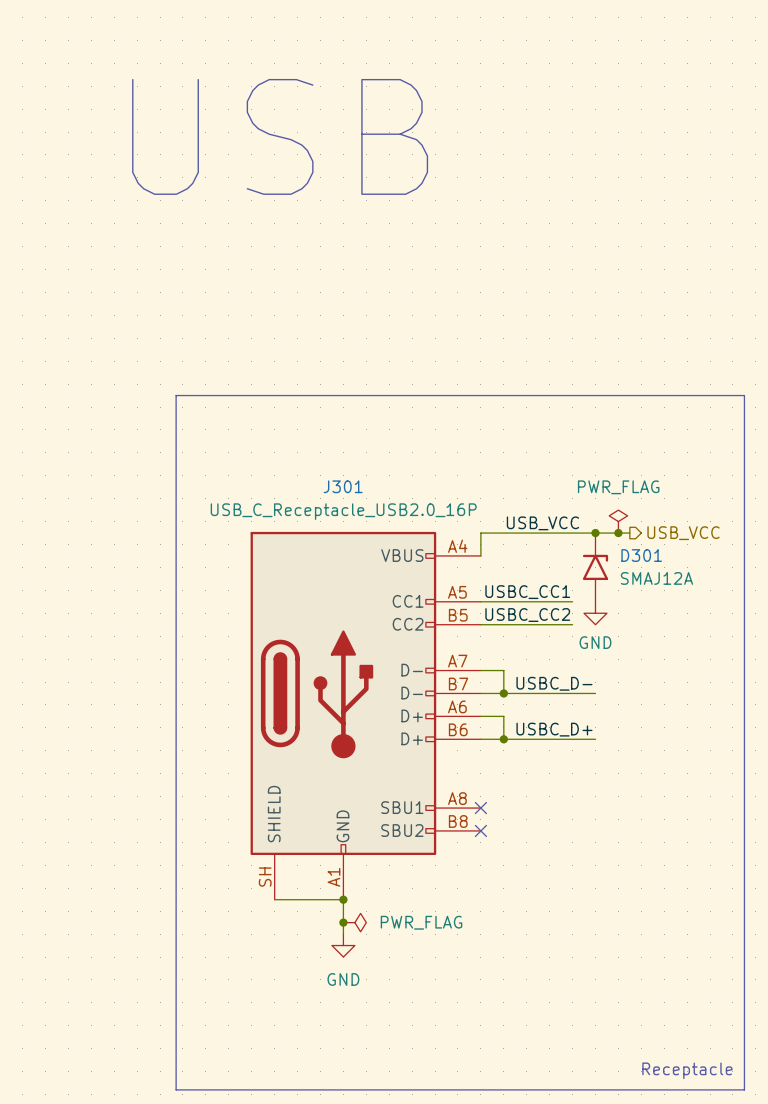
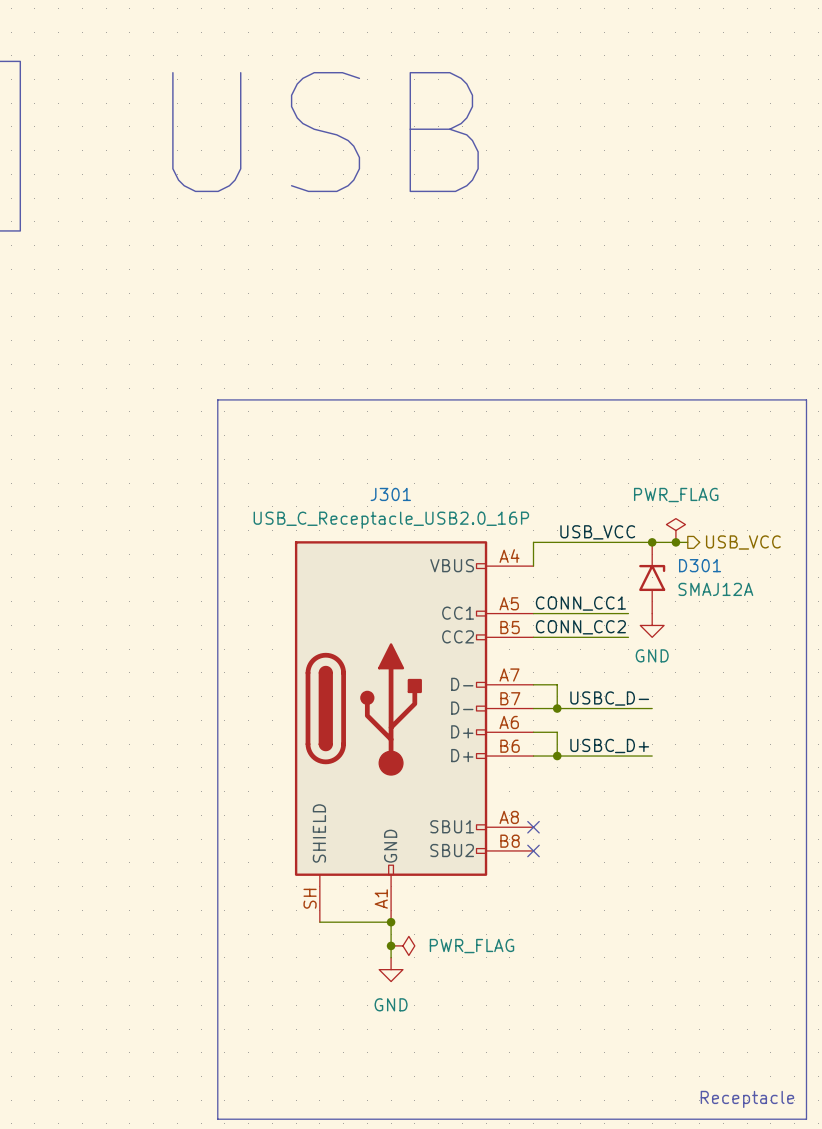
label: USBC_CC1 (527, 592) -> CONN_CC1 (580, 603)
label: USBC_CC2 (527, 615) -> CONN_CC2 (580, 627)

